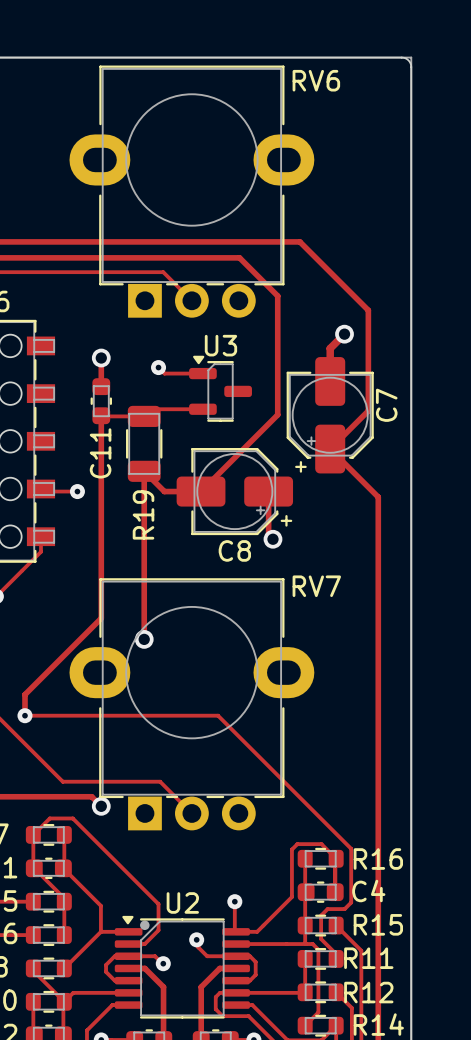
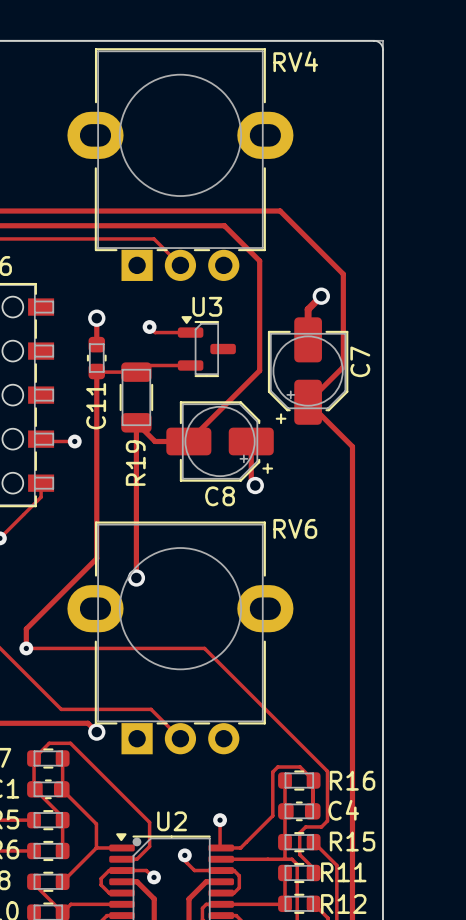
RV6 name: RV6 (316, 80) -> RV4 (295, 61)
RV7 name: RV7 (316, 586) -> RV6 (295, 528)

